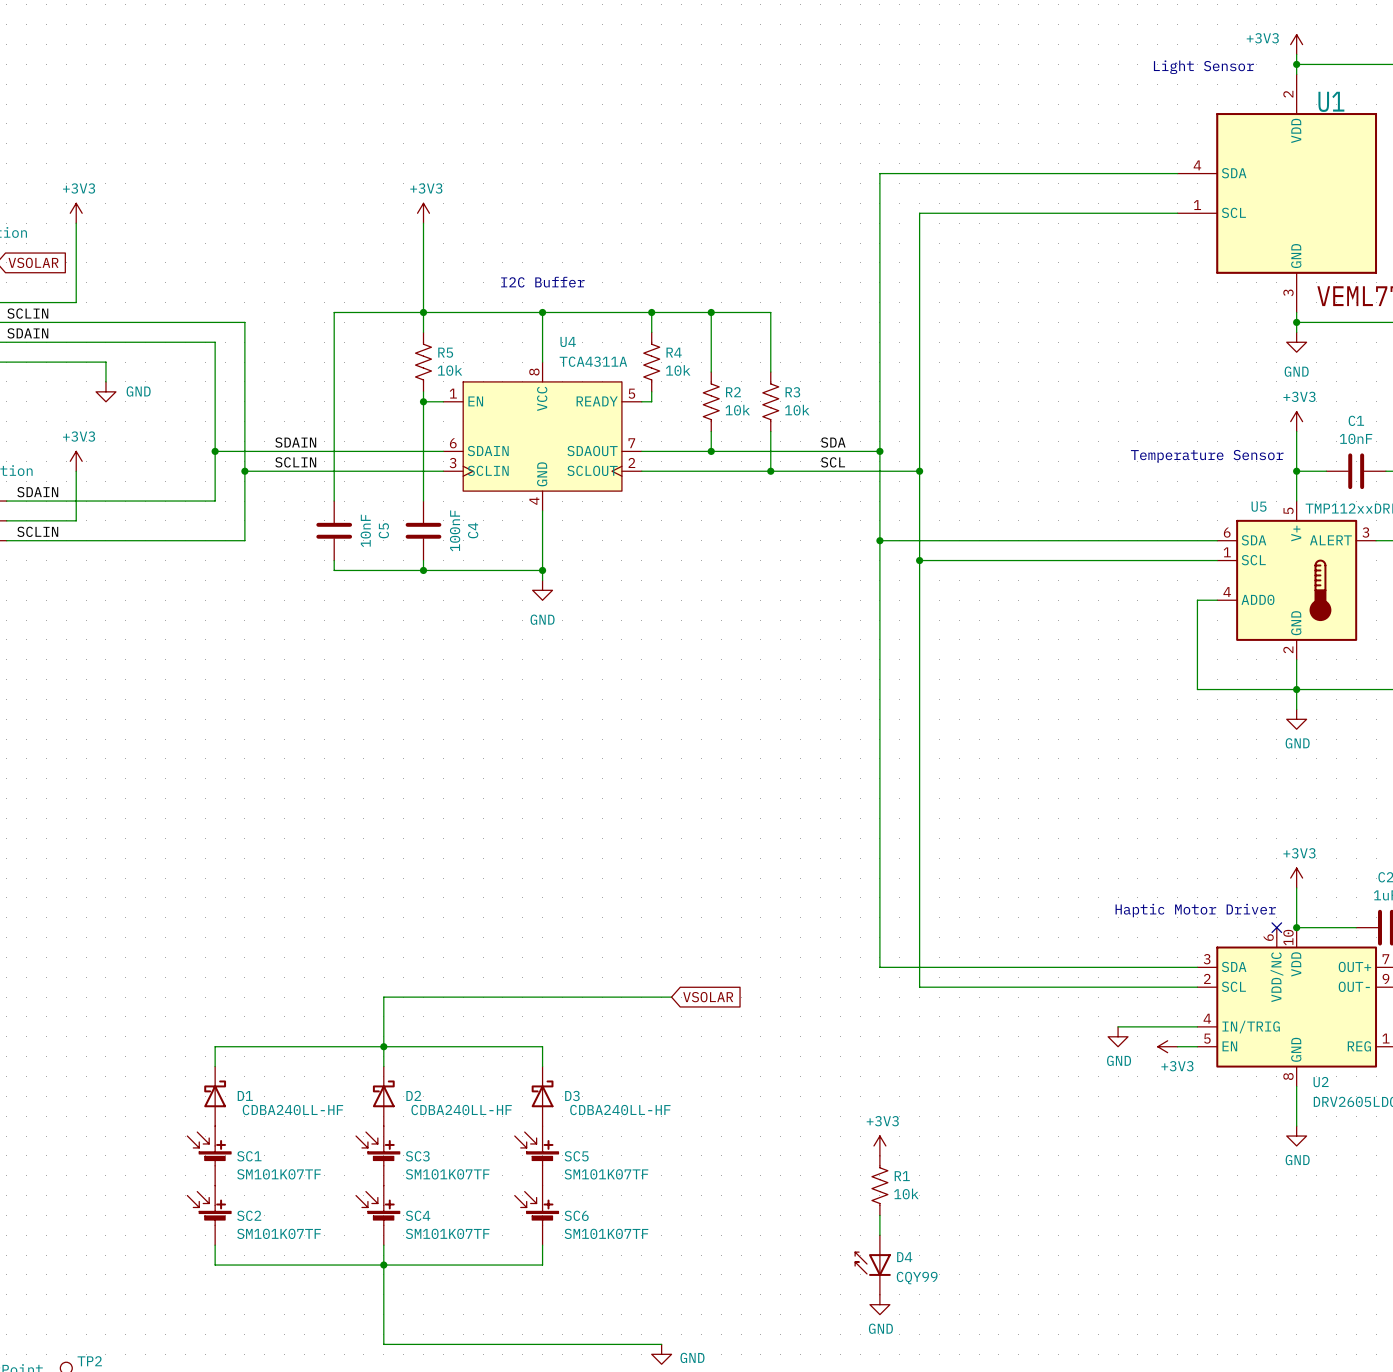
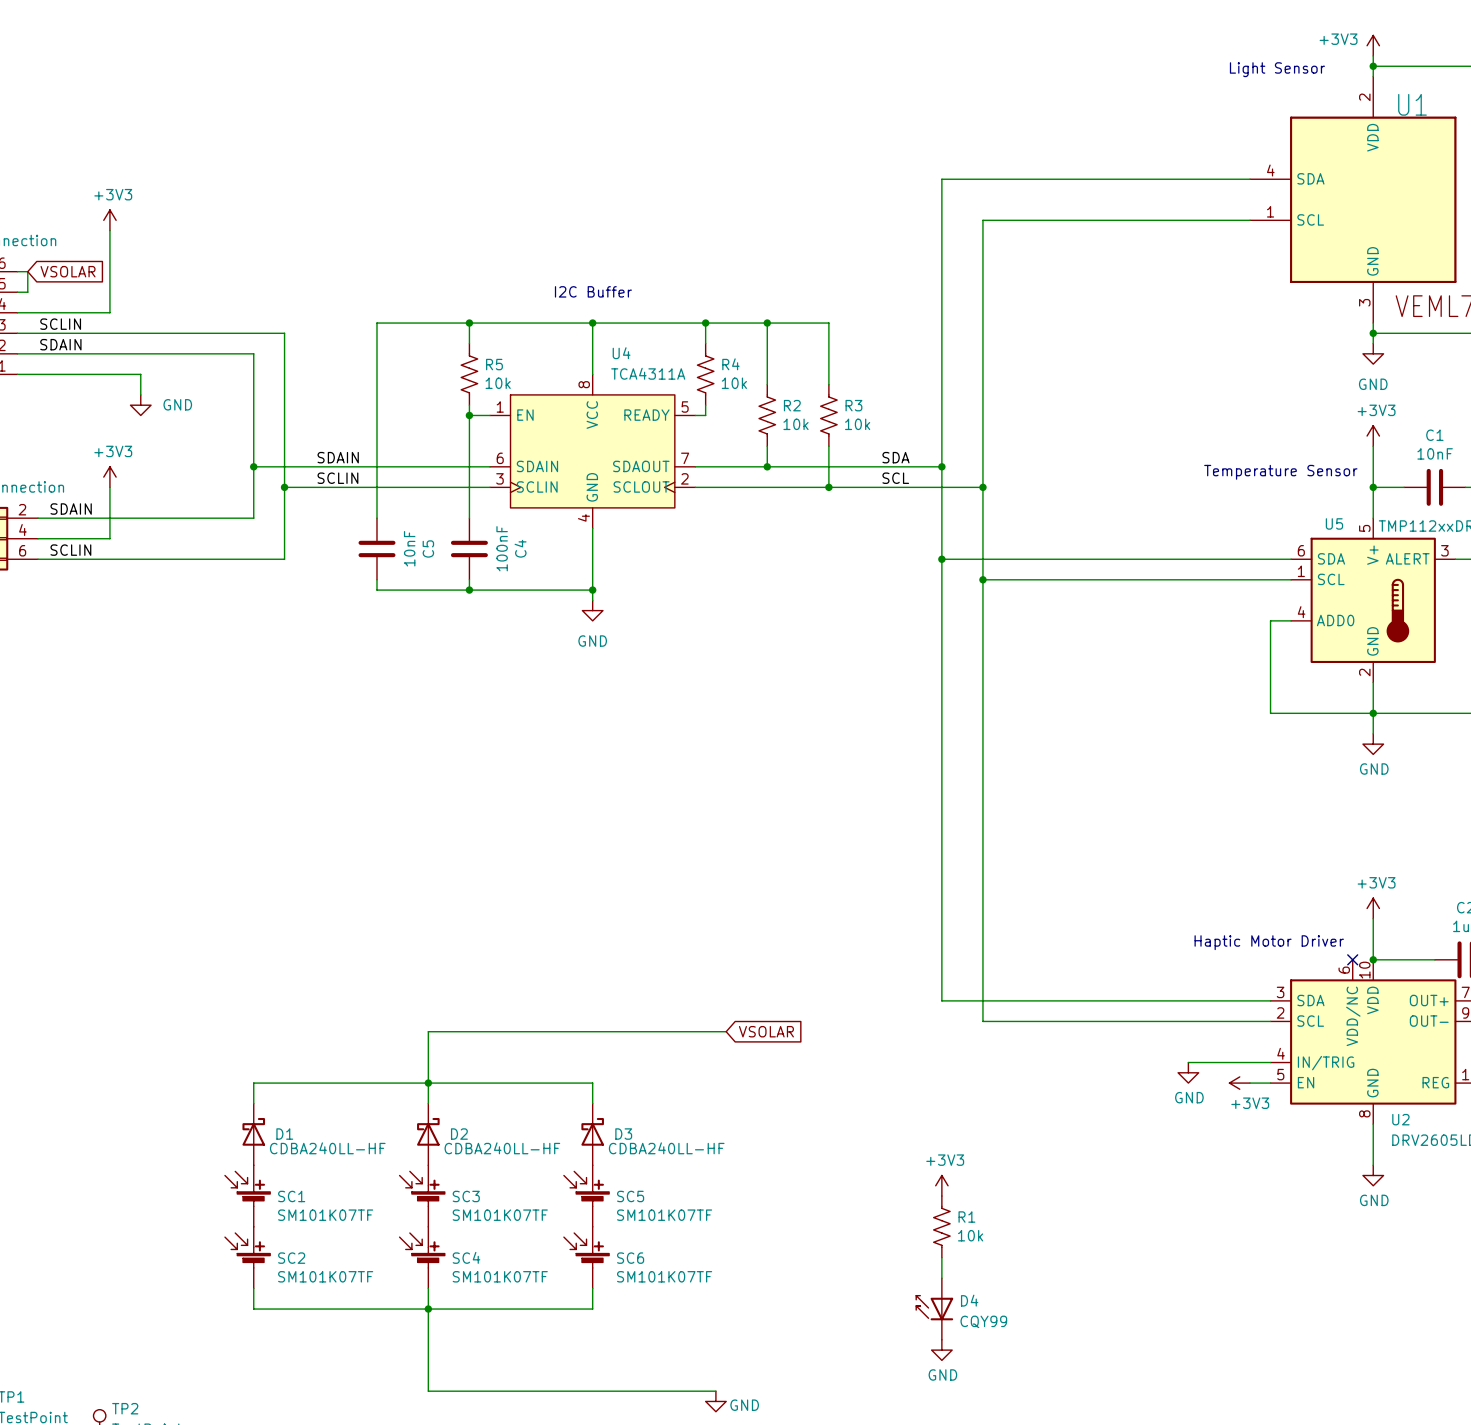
power symbol: +3V3 (423, 213) -> none
wire: (423, 223) (423, 312) -> none

